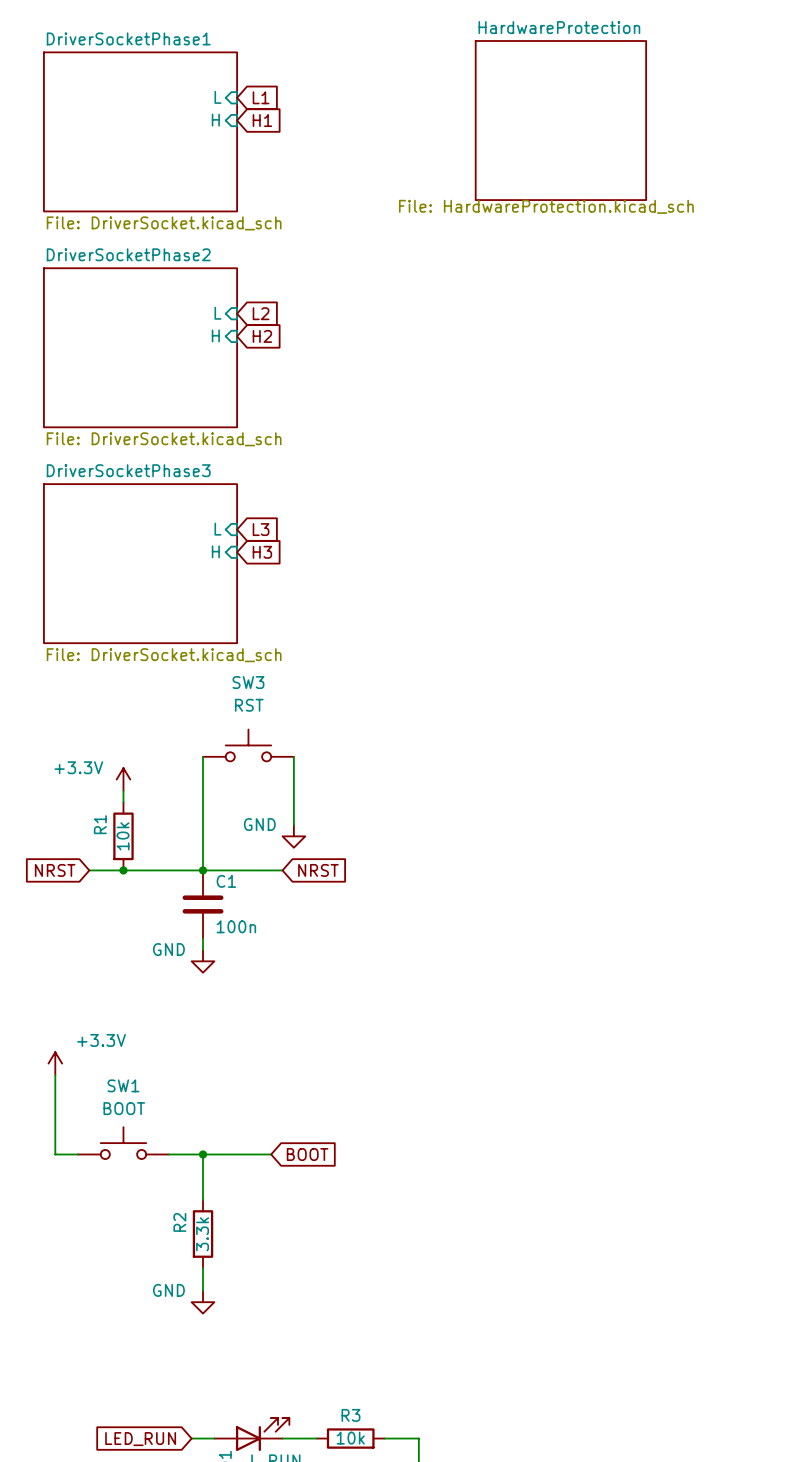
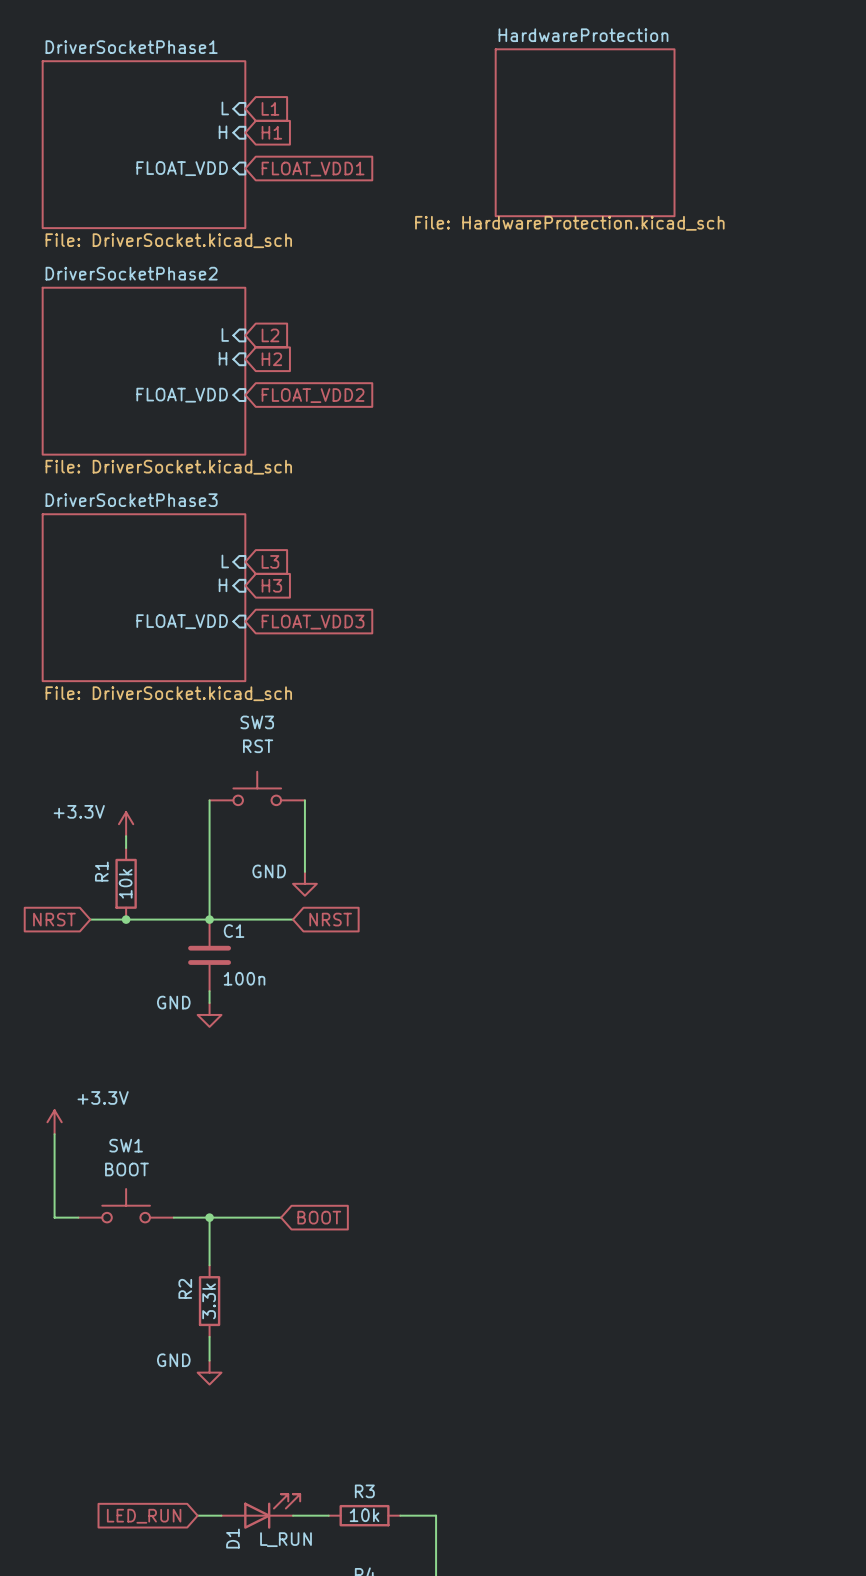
sheet pin: none -> FLOAT_VDD (182, 168)
global label: none -> FLOAT_VDD1 (313, 169)
sheet pin: none -> FLOAT_VDD (182, 395)
global label: none -> FLOAT_VDD2 (313, 395)
sheet pin: none -> FLOAT_VDD (182, 621)
global label: none -> FLOAT_VDD3 (313, 622)

